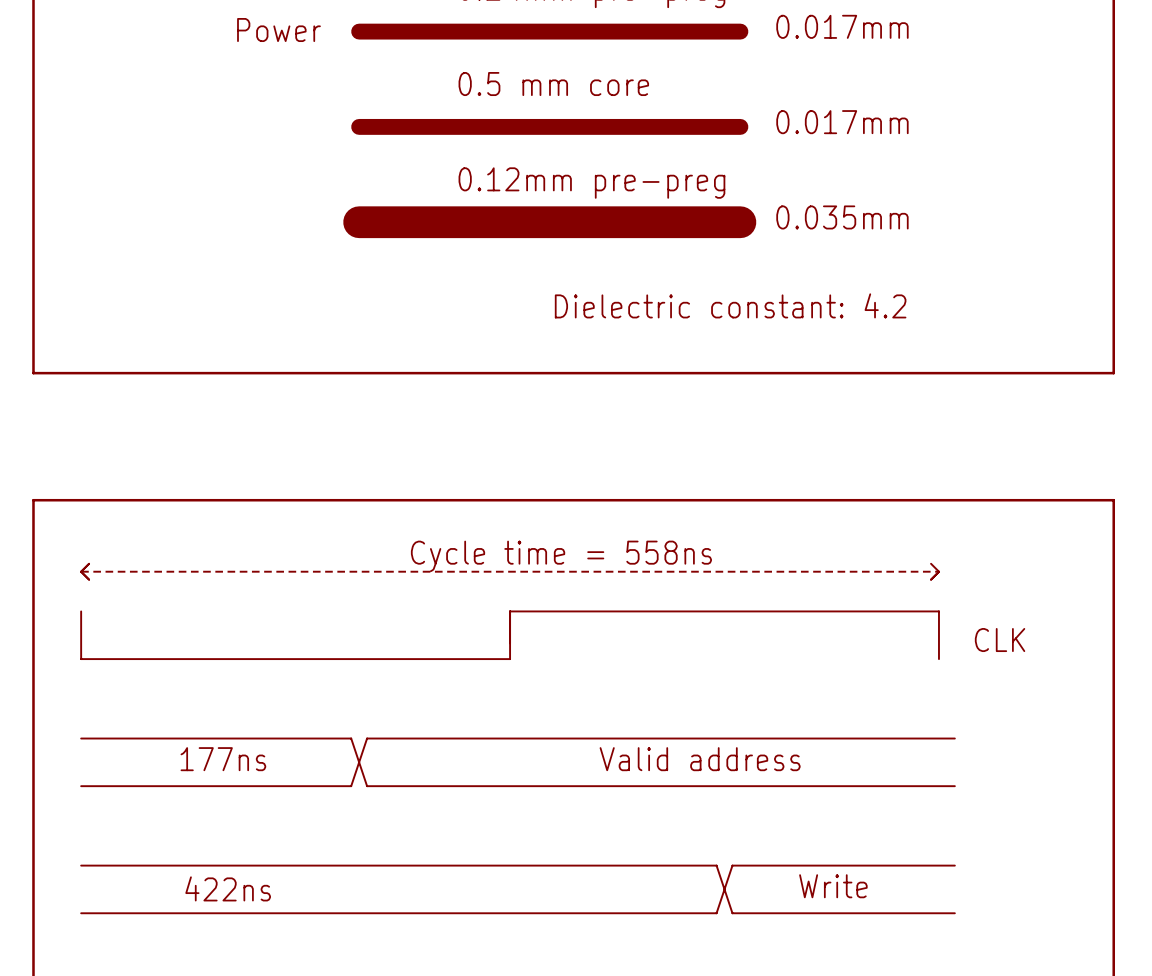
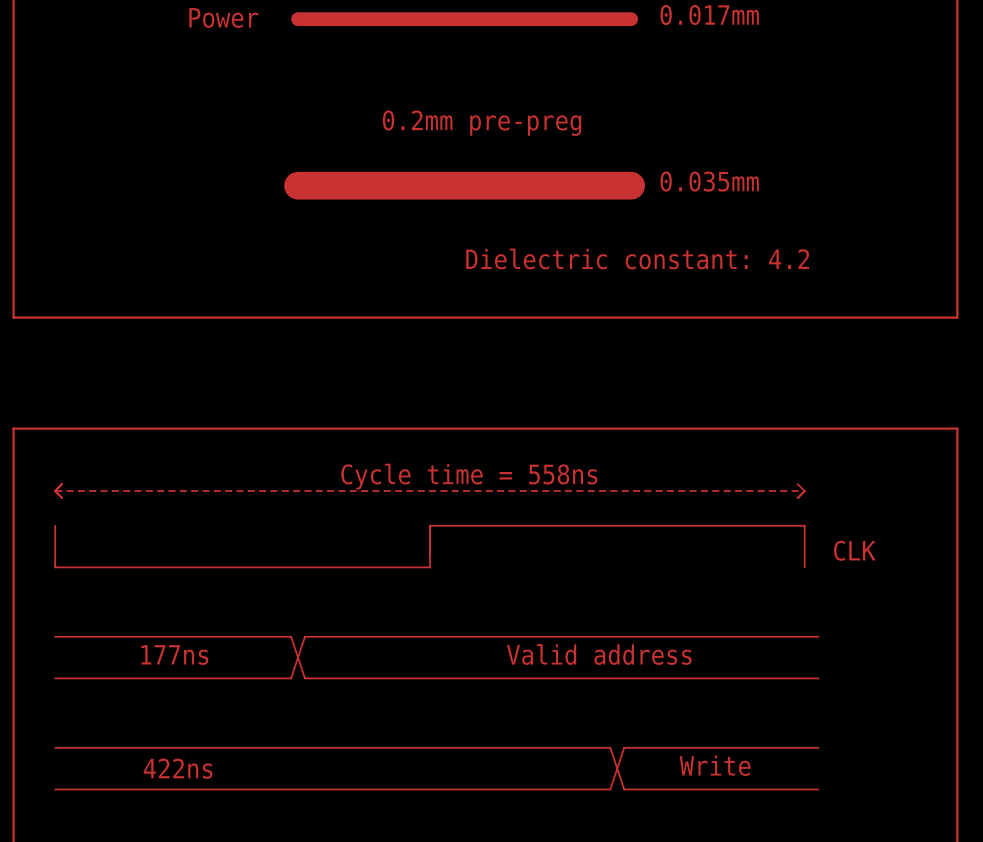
text: 0.5 mm core (553, 84) -> none
text: 0.017mm (842, 122) -> none
line: (359, 126) (740, 126) -> none
text: 0.12mm pre-preg (591, 183) -> 0.2mm pre-preg (482, 123)

